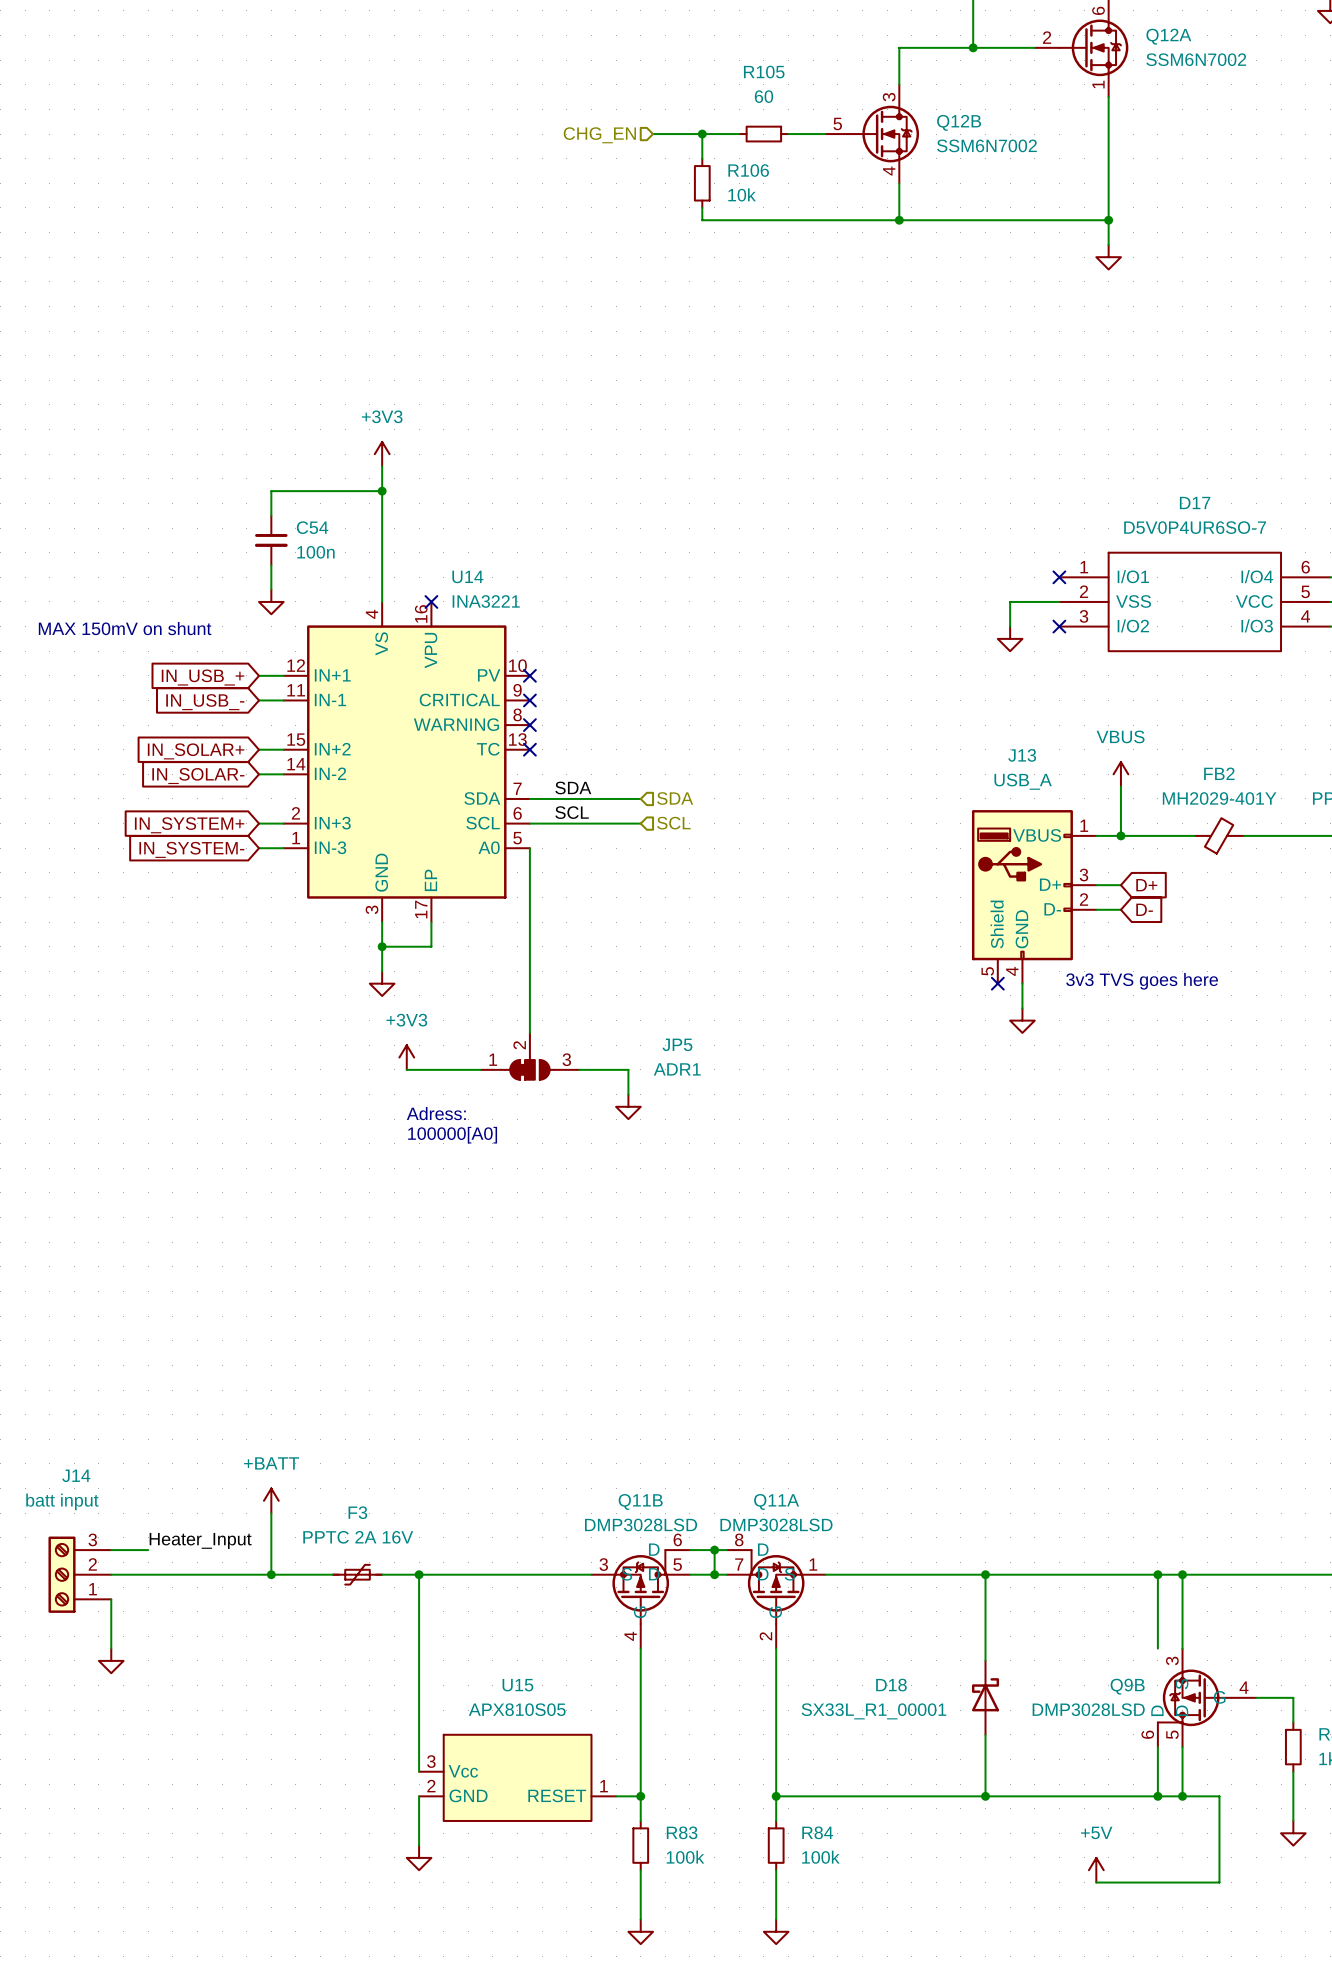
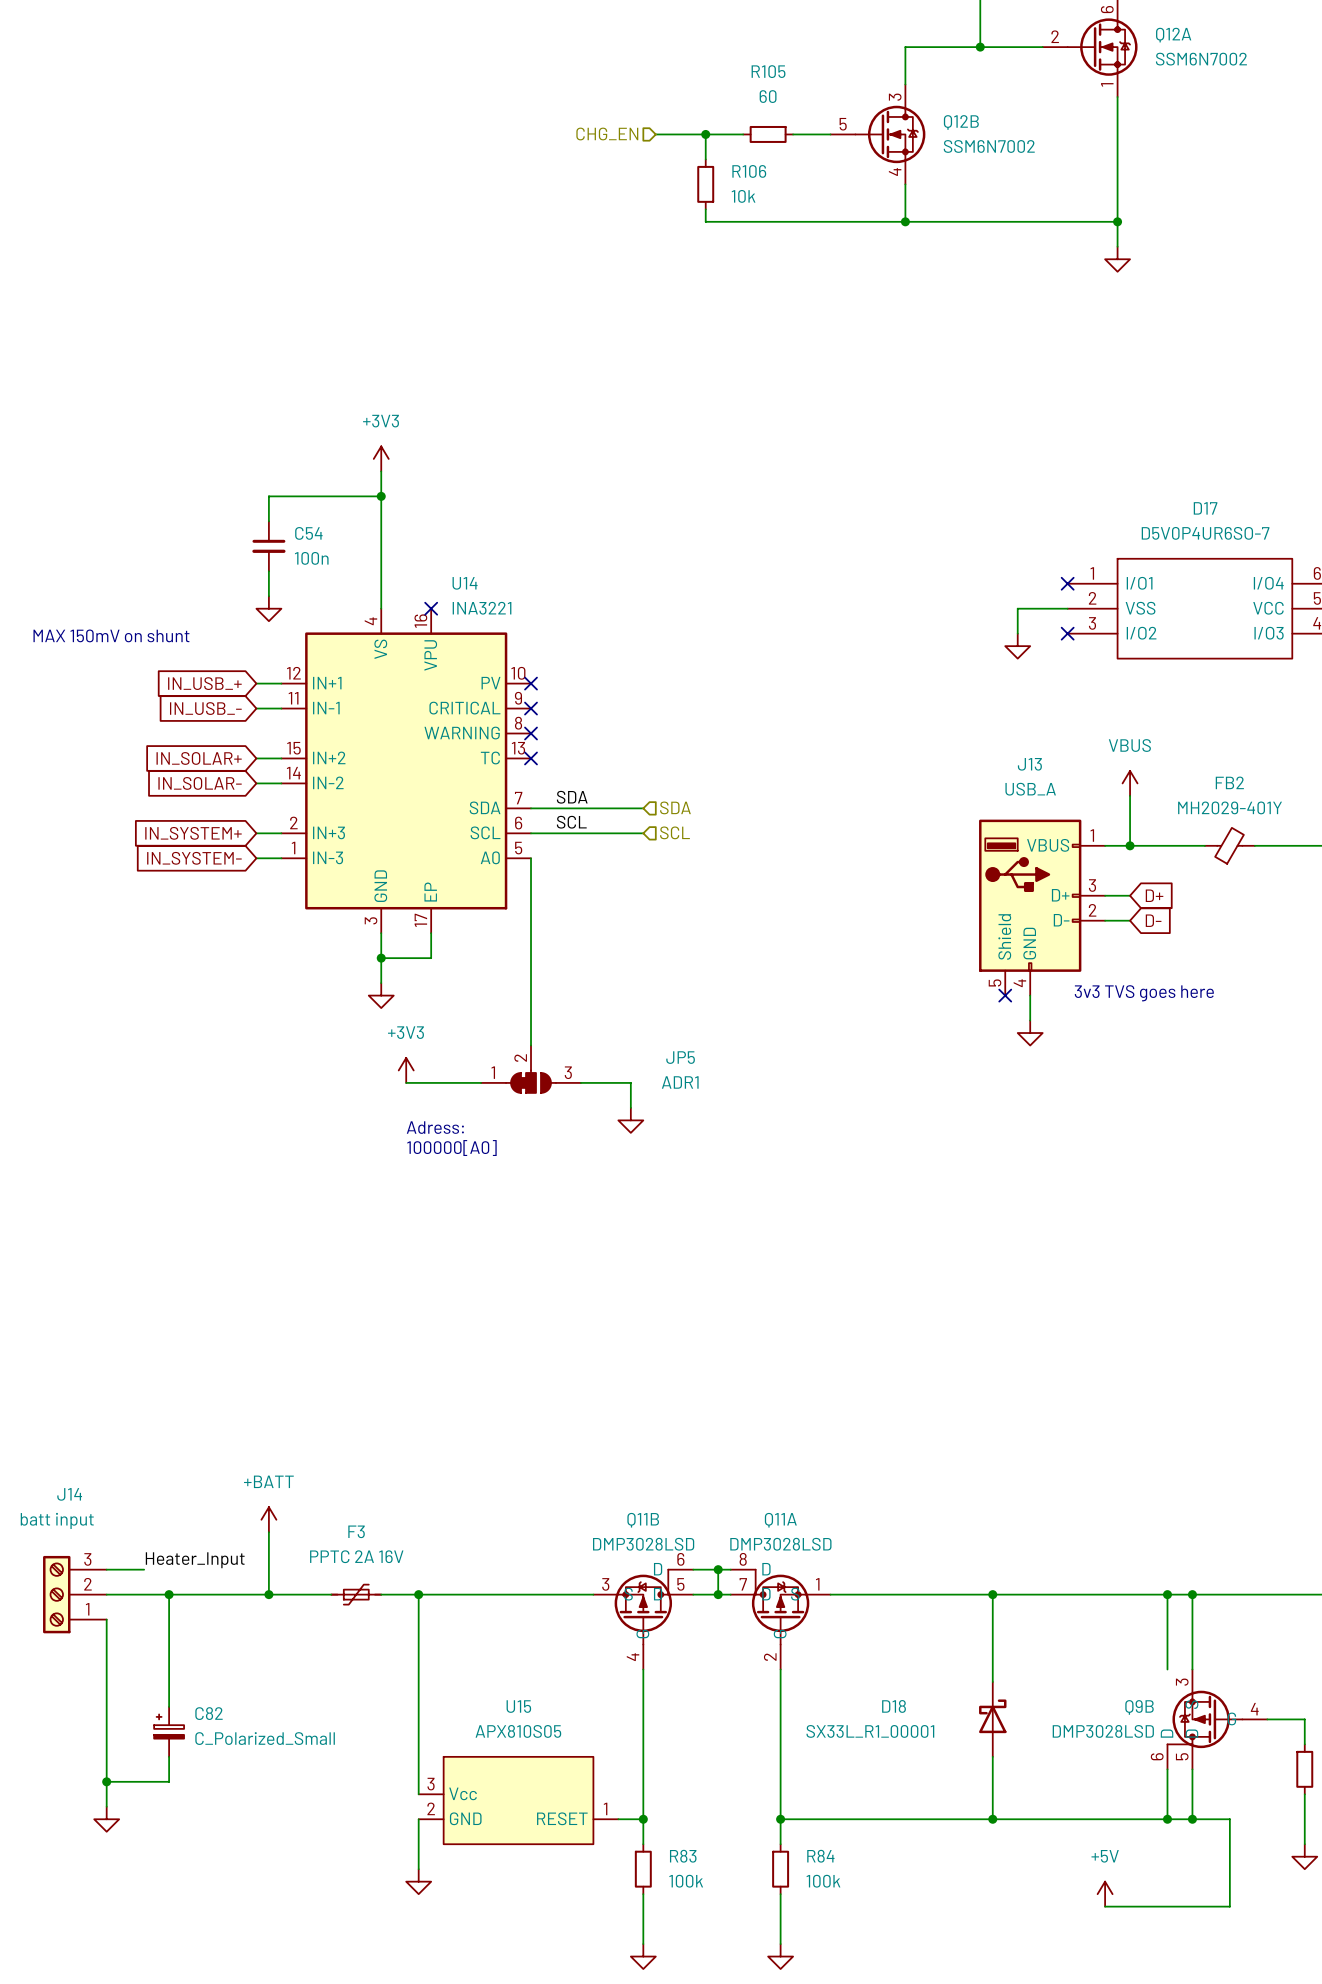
wire: none -> (169, 1594) (169, 1706)
junction: none -> (169, 1594)
wire: none -> (106, 1669) (106, 1806)
power symbol position: (111, 1660) -> (106, 1819)
C82: none -> C_Polarized_Small (169, 1731)
wire: none -> (169, 1756) (169, 1781) (106, 1781)
junction: none -> (106, 1781)

